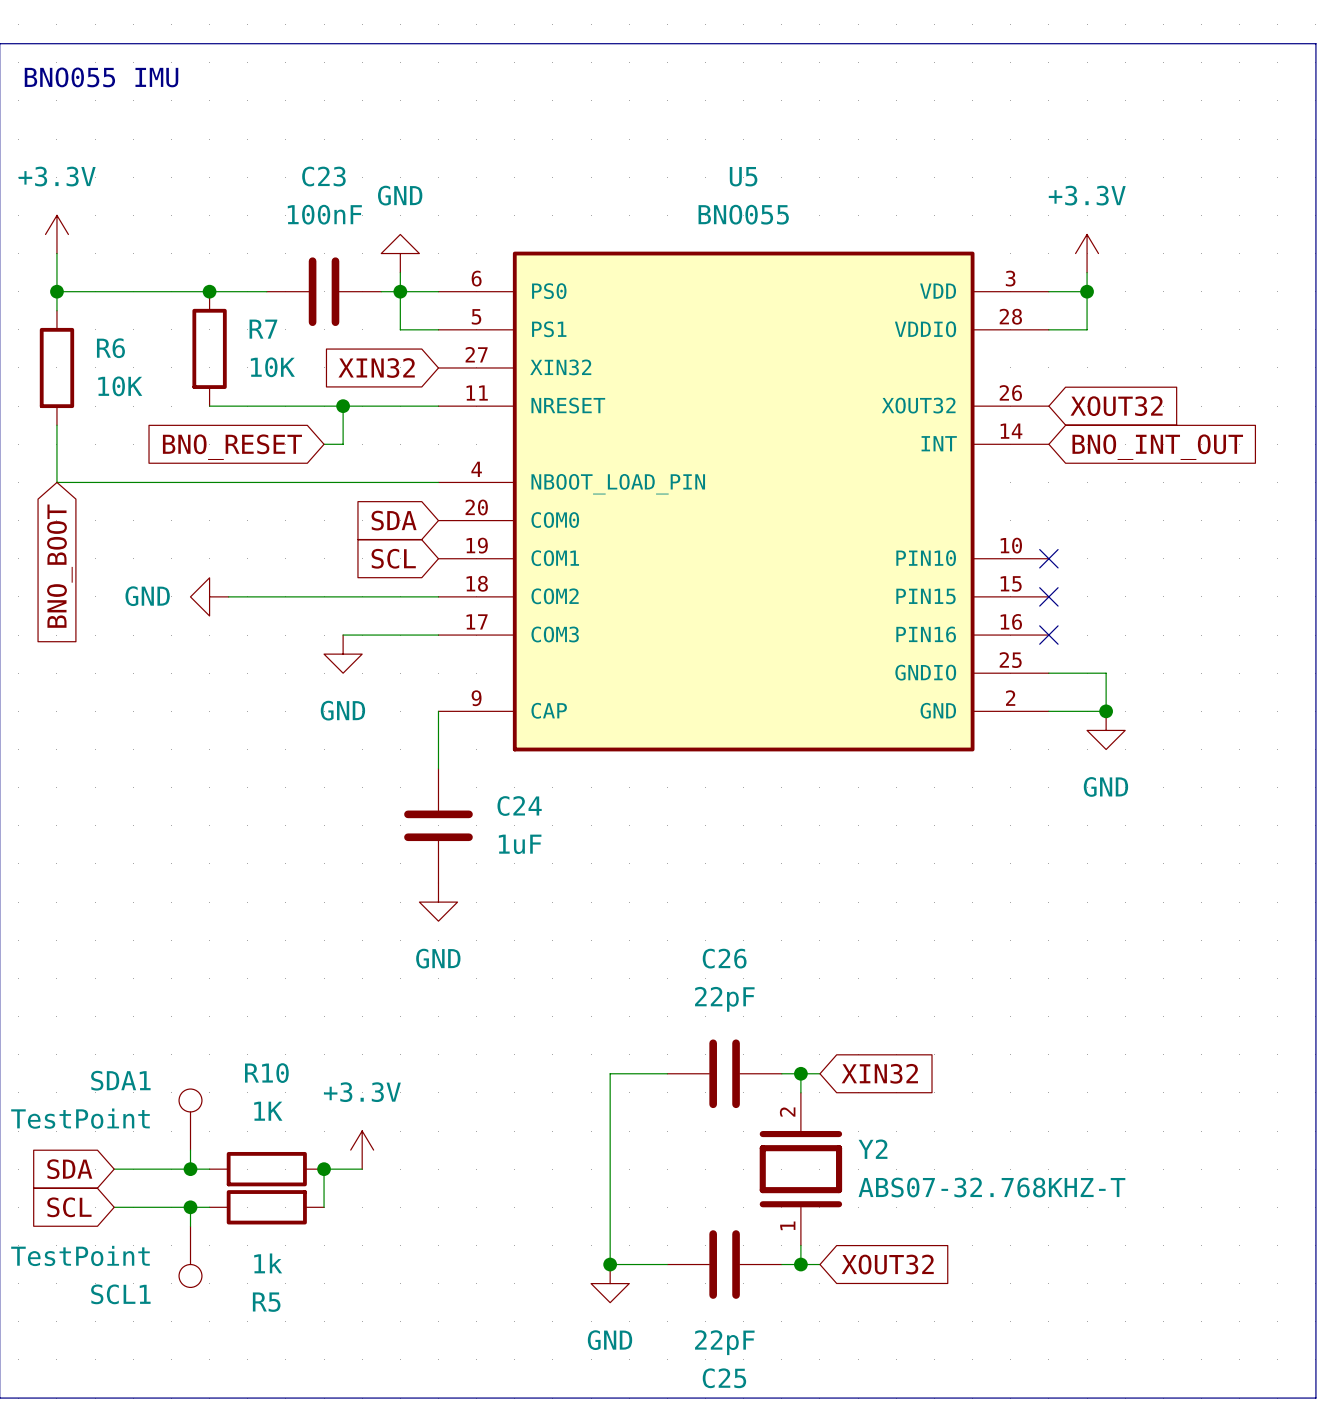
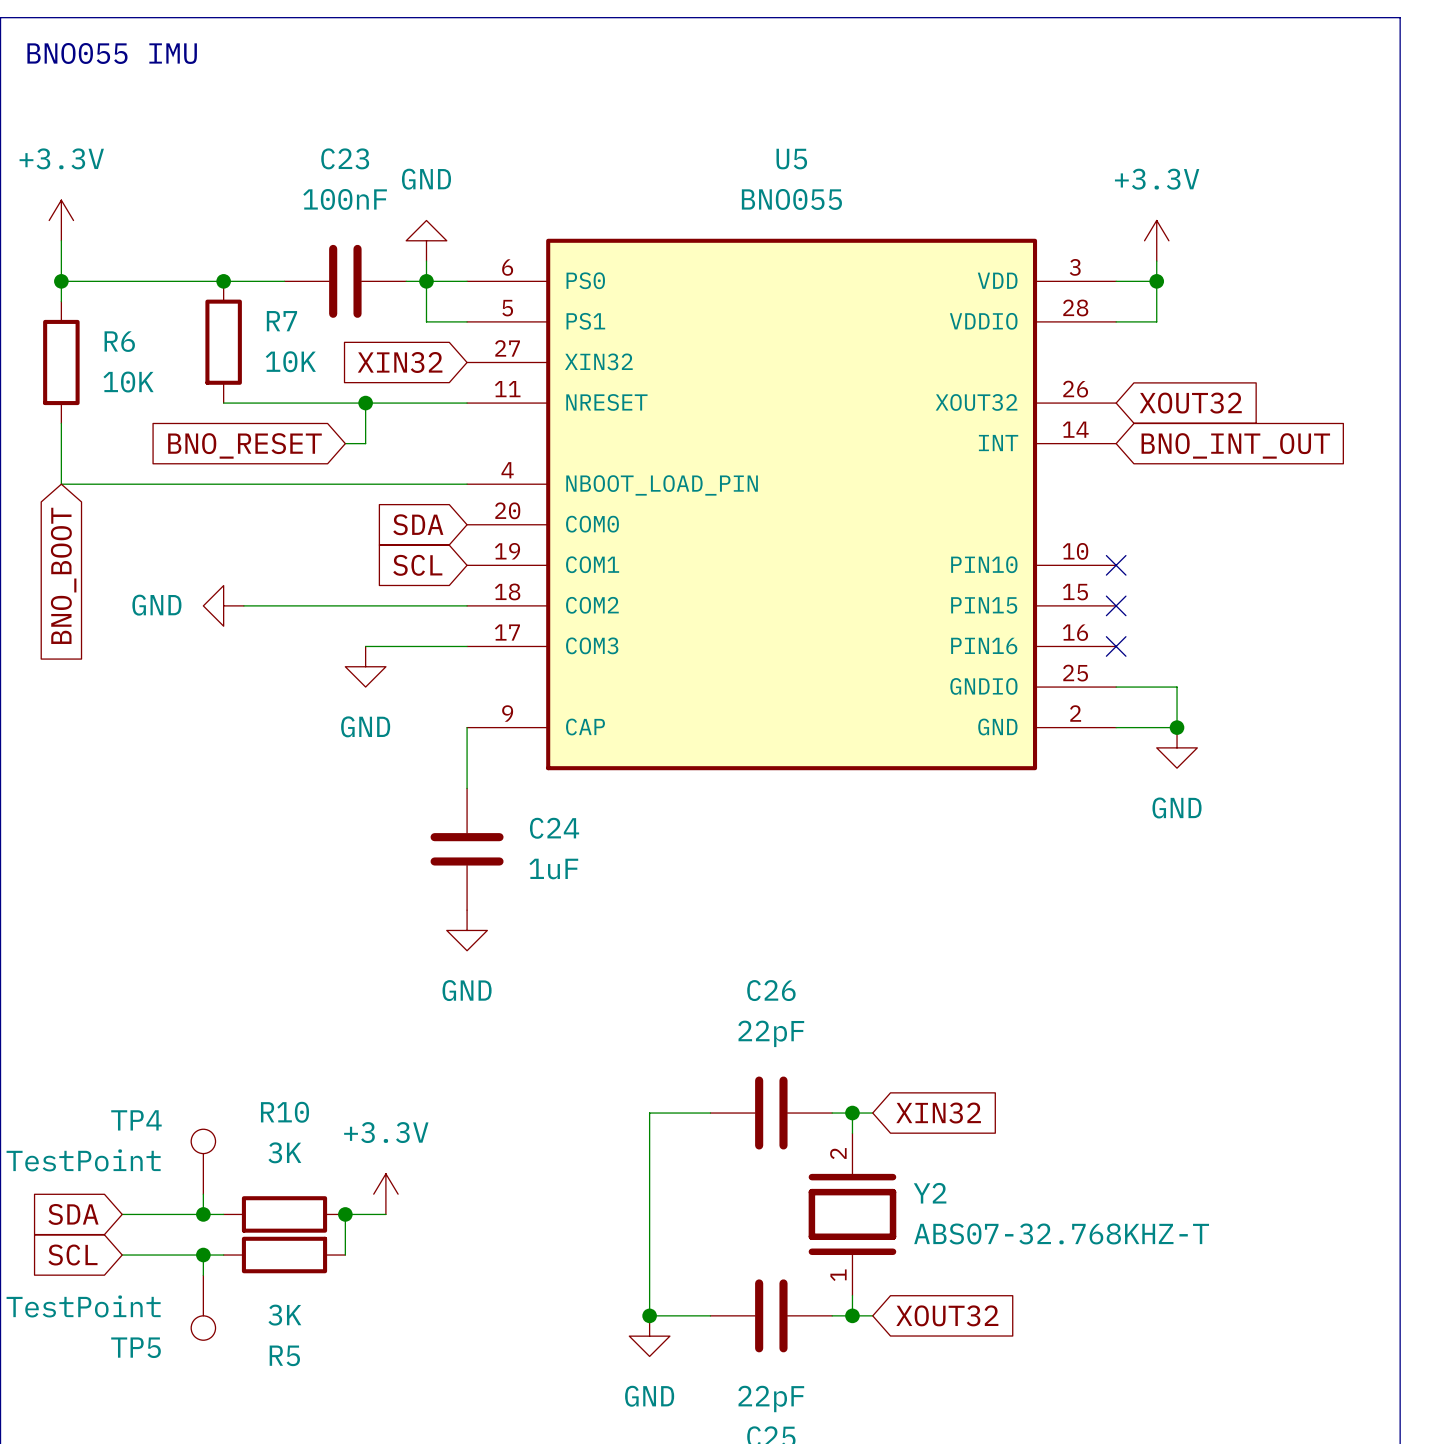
SDA1 name: SDA1 (120, 1080) -> TP4 (136, 1120)
R10 value: 1K (268, 1111) -> 3K (284, 1152)
R5 value: 1k (268, 1263) -> 3K (284, 1315)
SCL1 name: SCL1 (120, 1294) -> TP5 (136, 1347)

